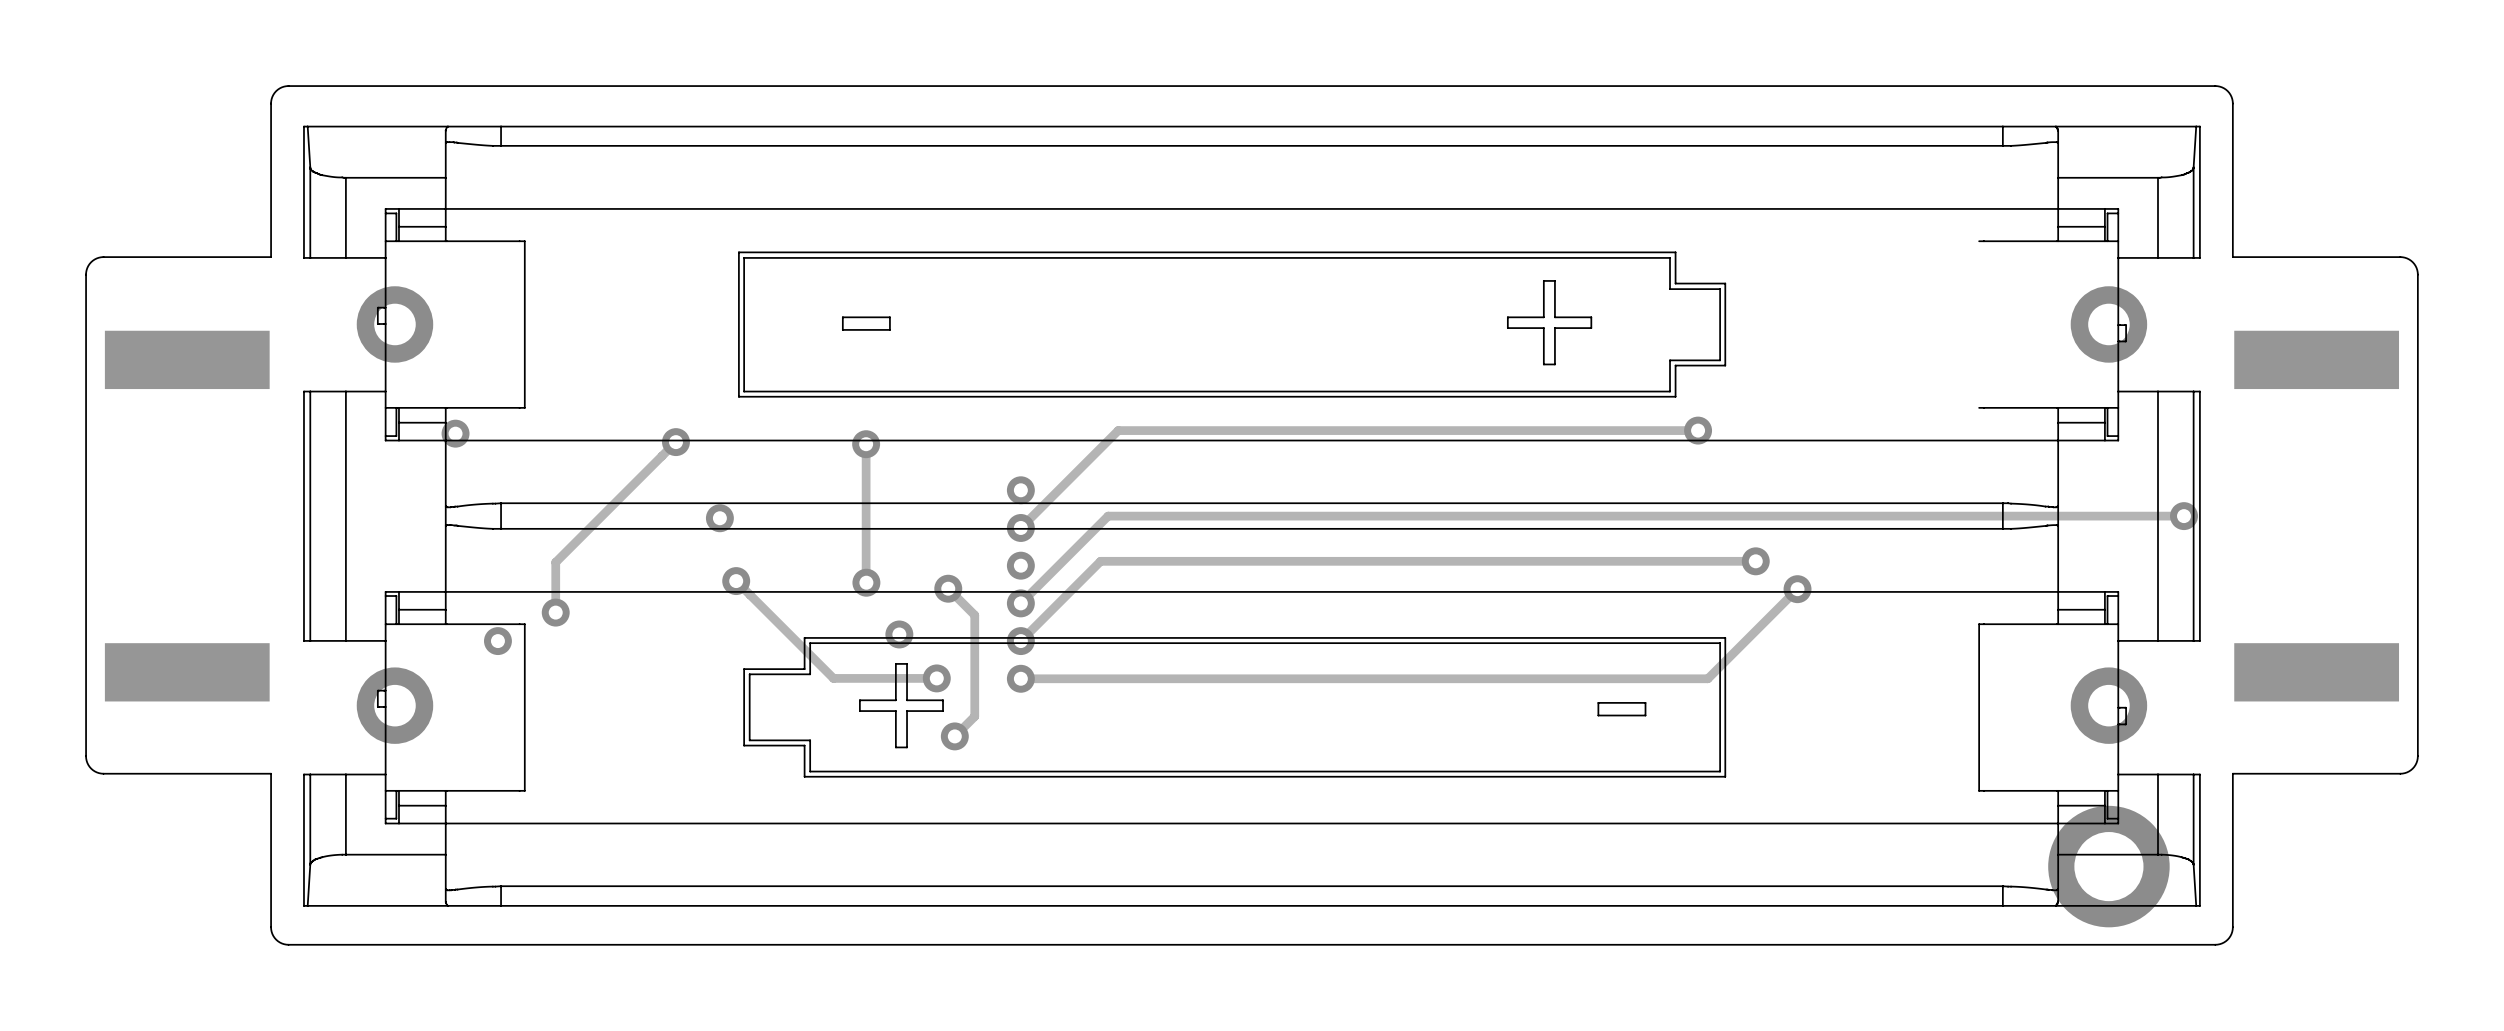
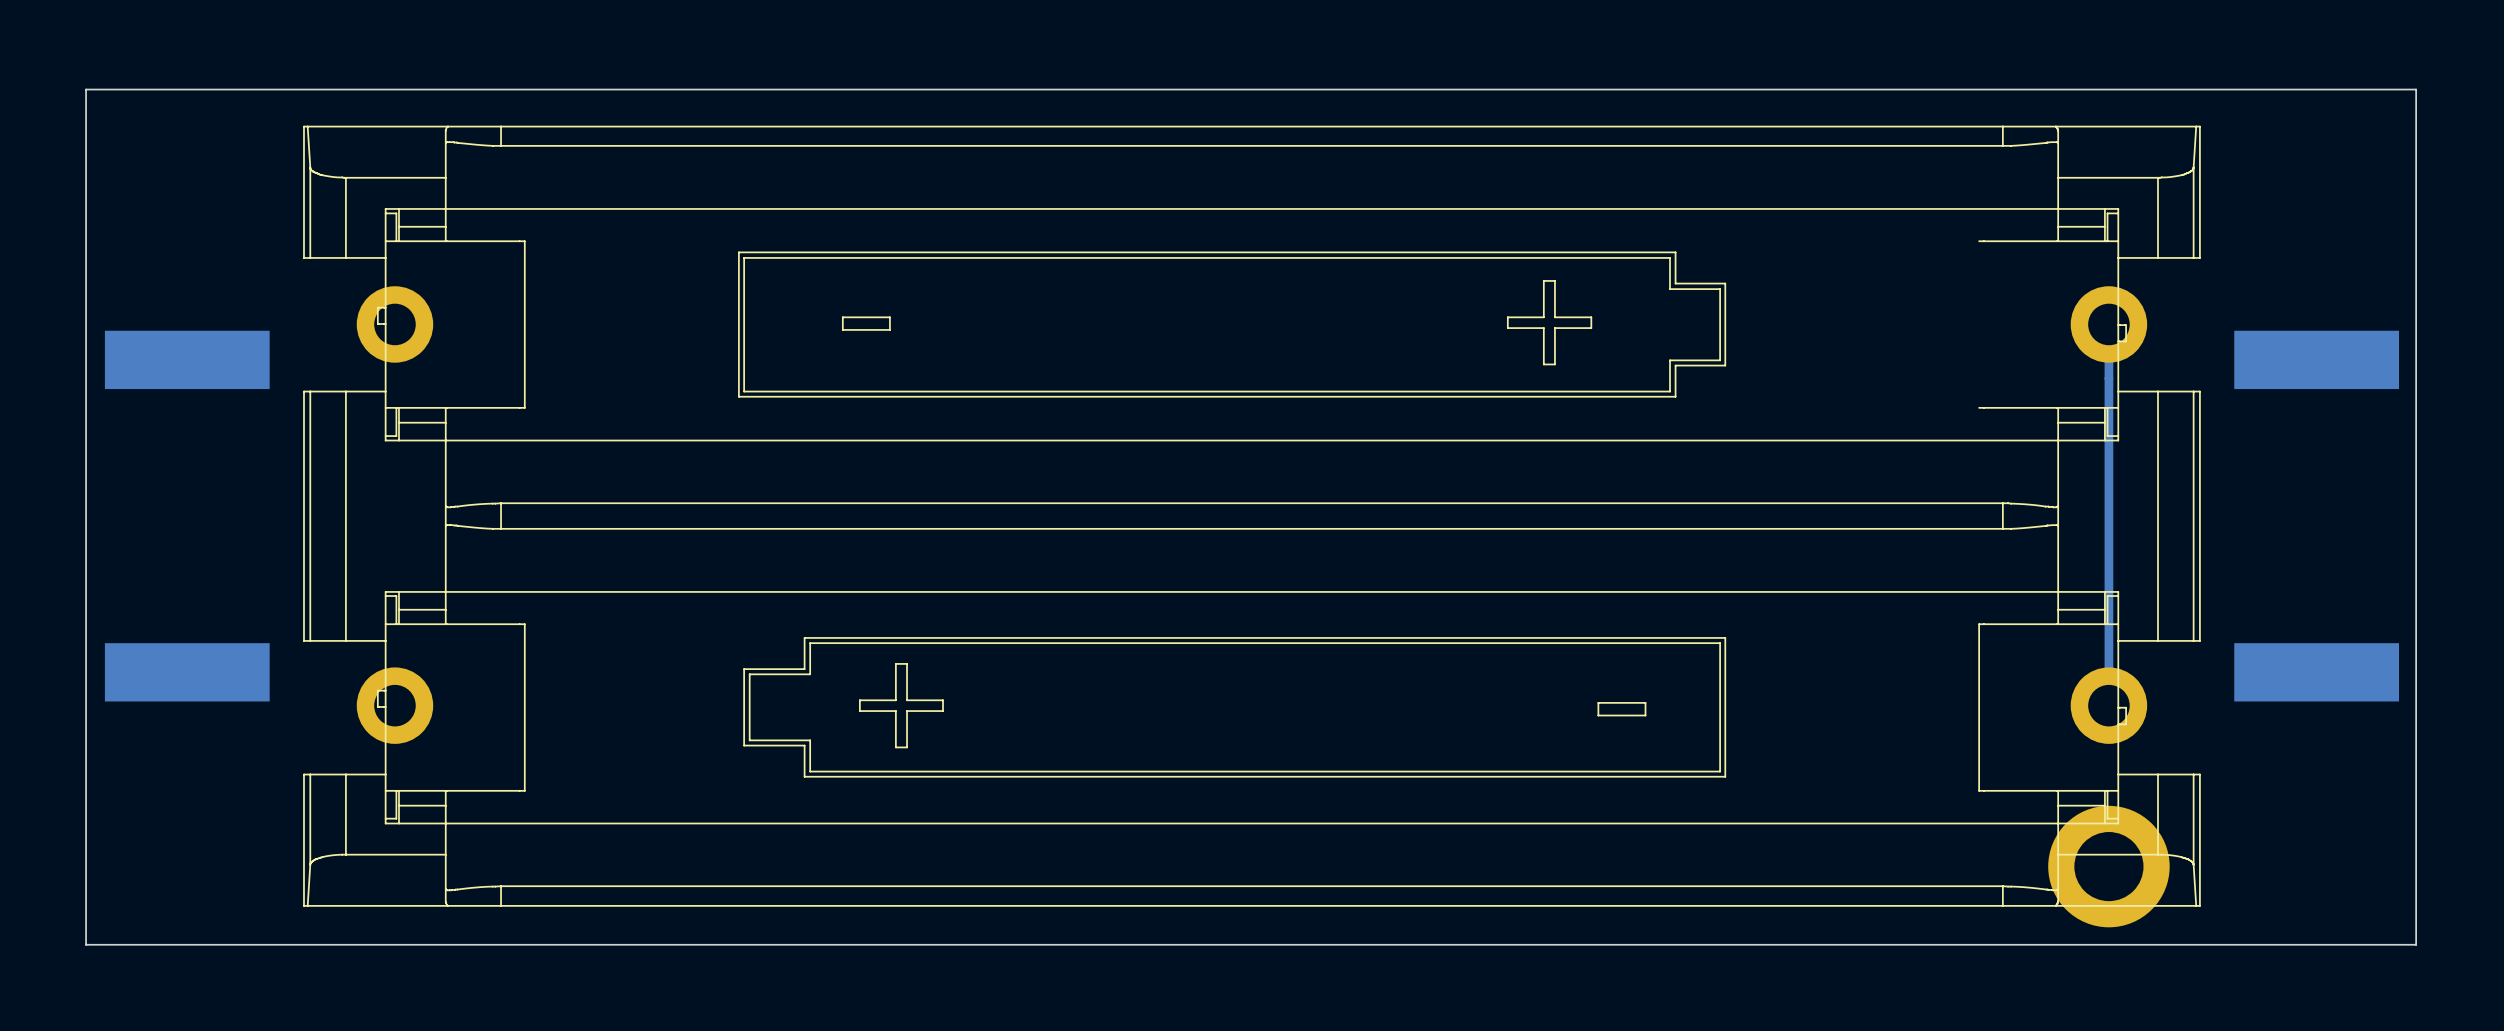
board edge: (86, 274) (91, 262) (101, 257) (271, 257) (271, 101) (276, 91) (286, 86) (2219, 86) (2229, 92) (2232, 101) (2232, 257) (2402, 257) (2411, 260) (2417, 270) (2417, 756) (2414, 766) (2402, 773) (2232, 773) (2232, 929) (2226, 941) (2215, 944) -> (86, 274) (86, 89) (2416, 89) (2416, 944) (2215, 944)
track: none -> (2108, 324) (2108, 705)
track: (1698, 430) (1118, 430) (1020, 527) -> none
via: (1698, 430) -> none
via: (455, 433) -> none
track: (675, 442) (555, 562) (555, 612) -> none
via: (675, 442) -> none
track: (866, 444) (866, 582) -> none
via: (866, 444) -> none
via: (1020, 490) -> none
track: (2183, 516) (1108, 516) (1020, 603) -> none
via: (2183, 516) -> none
via: (719, 518) -> none
via: (1020, 527) -> none
track: (1755, 561) (1100, 561) (1020, 641) -> none
via: (1755, 561) -> none
via: (1020, 565) -> none
track: (736, 581) (833, 678) (936, 678) -> none
via: (736, 581) -> none
via: (866, 582) -> none
track: (948, 588) (974, 615) (974, 716) (954, 736) -> none
via: (948, 588) -> none
track: (1797, 589) (1707, 678) (1020, 678) -> none
via: (1797, 589) -> none
via: (1020, 603) -> none
via: (555, 612) -> none
via: (899, 634) -> none
via: (497, 641) -> none
via: (1020, 641) -> none
via: (936, 678) -> none
via: (1020, 678) -> none
via: (954, 736) -> none
board edge: (86, 756) (91, 768) (101, 773) (271, 773) (271, 929) (277, 941) (288, 944) -> (86, 756) (86, 944) (288, 944)

